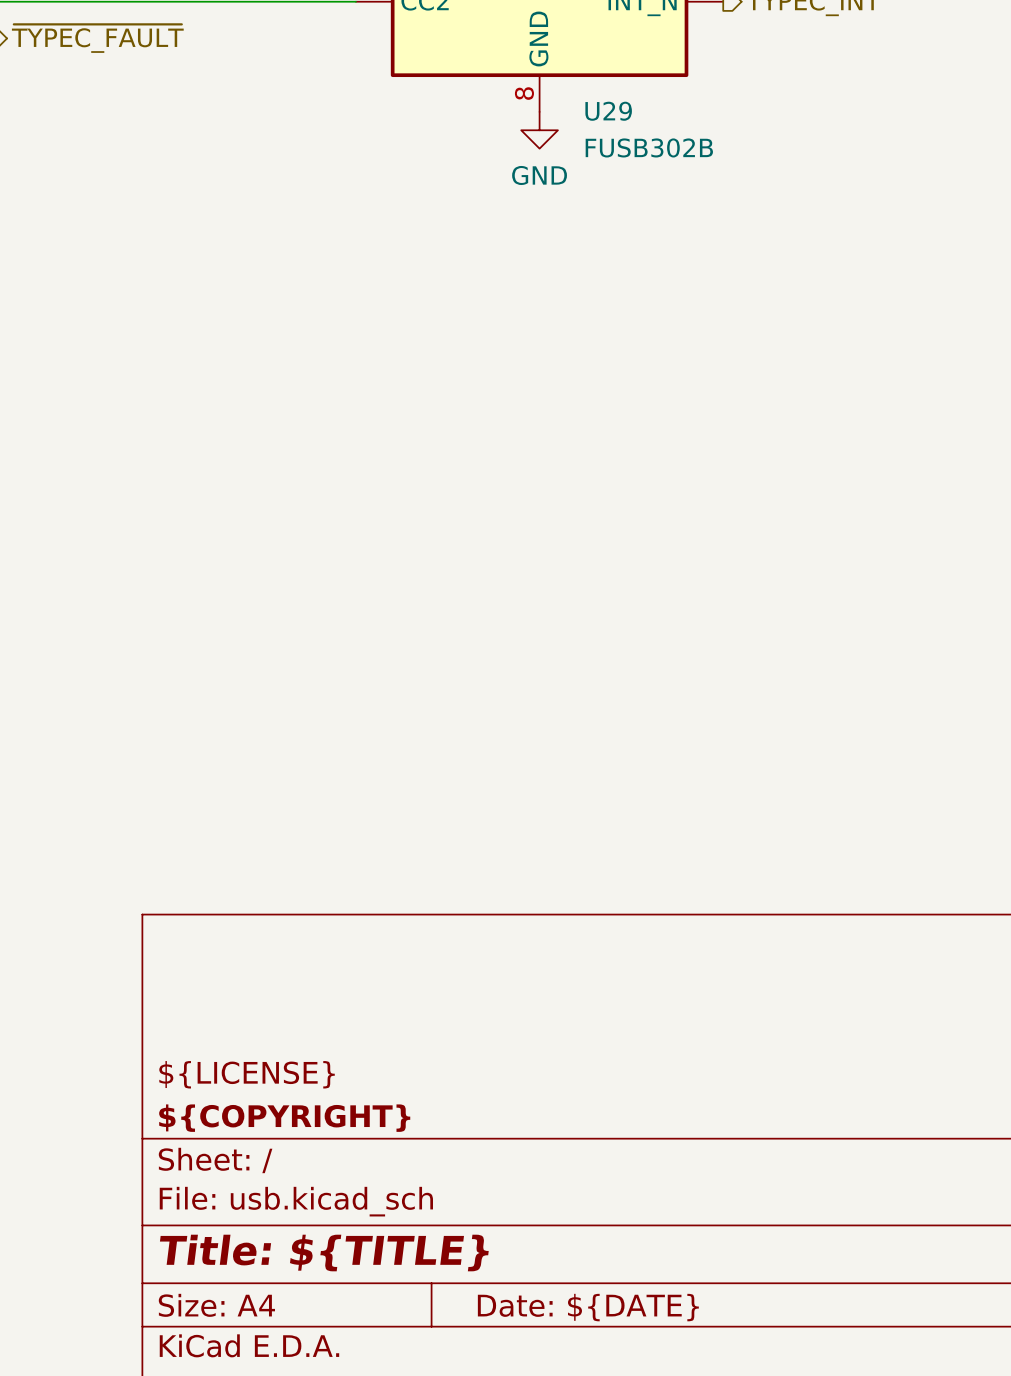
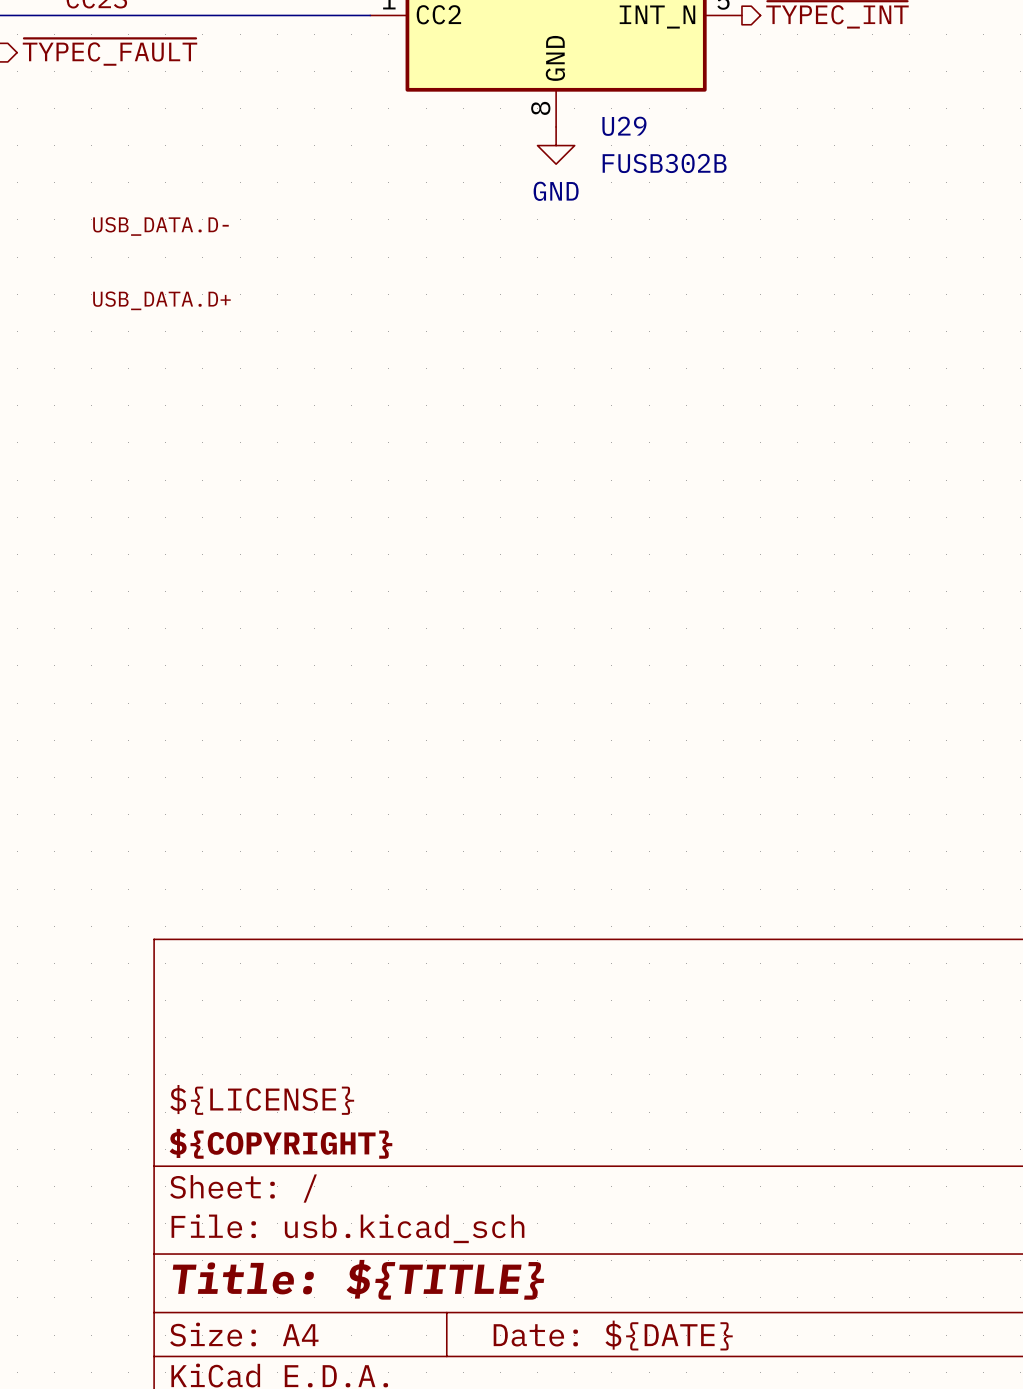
label: none -> USB_DATA.D- (160, 226)
label: none -> USB_DATA.D+ (161, 300)

